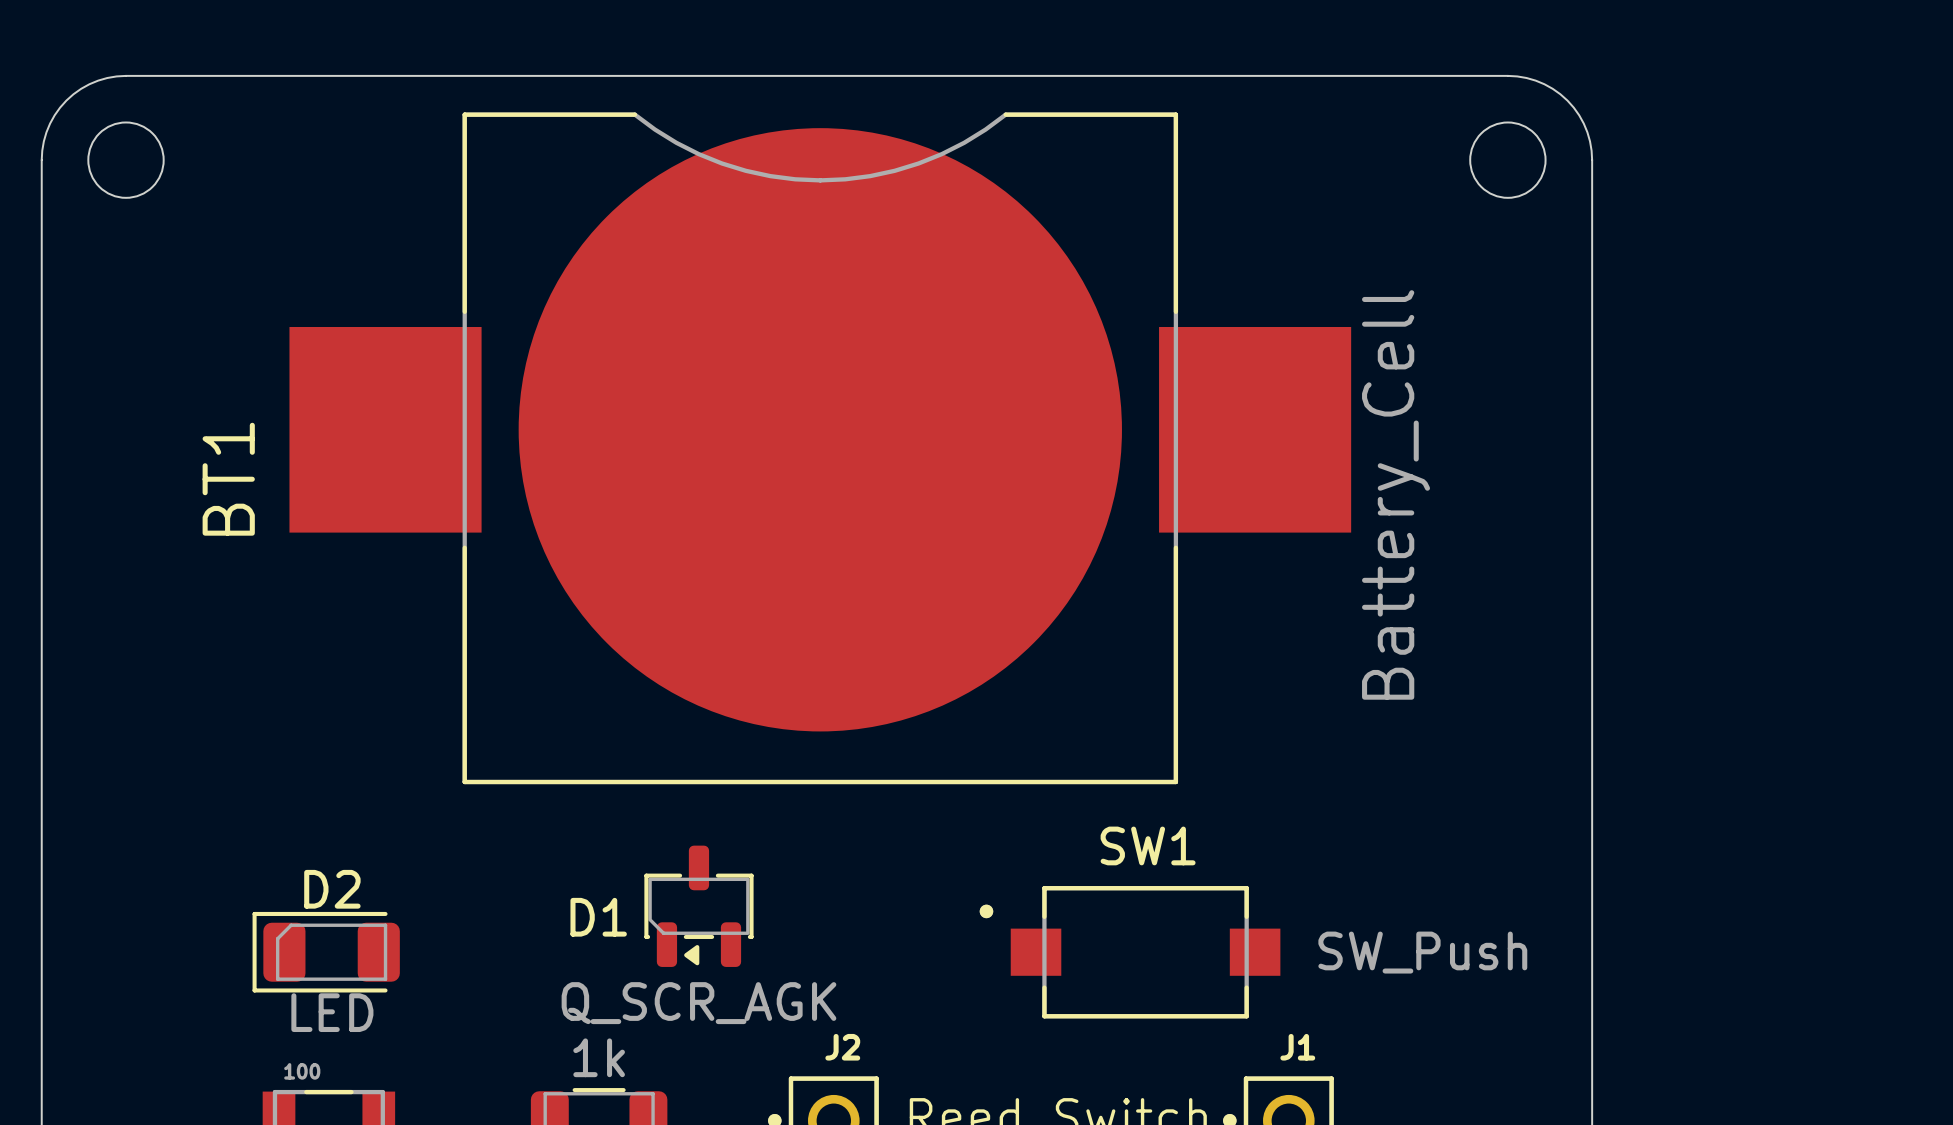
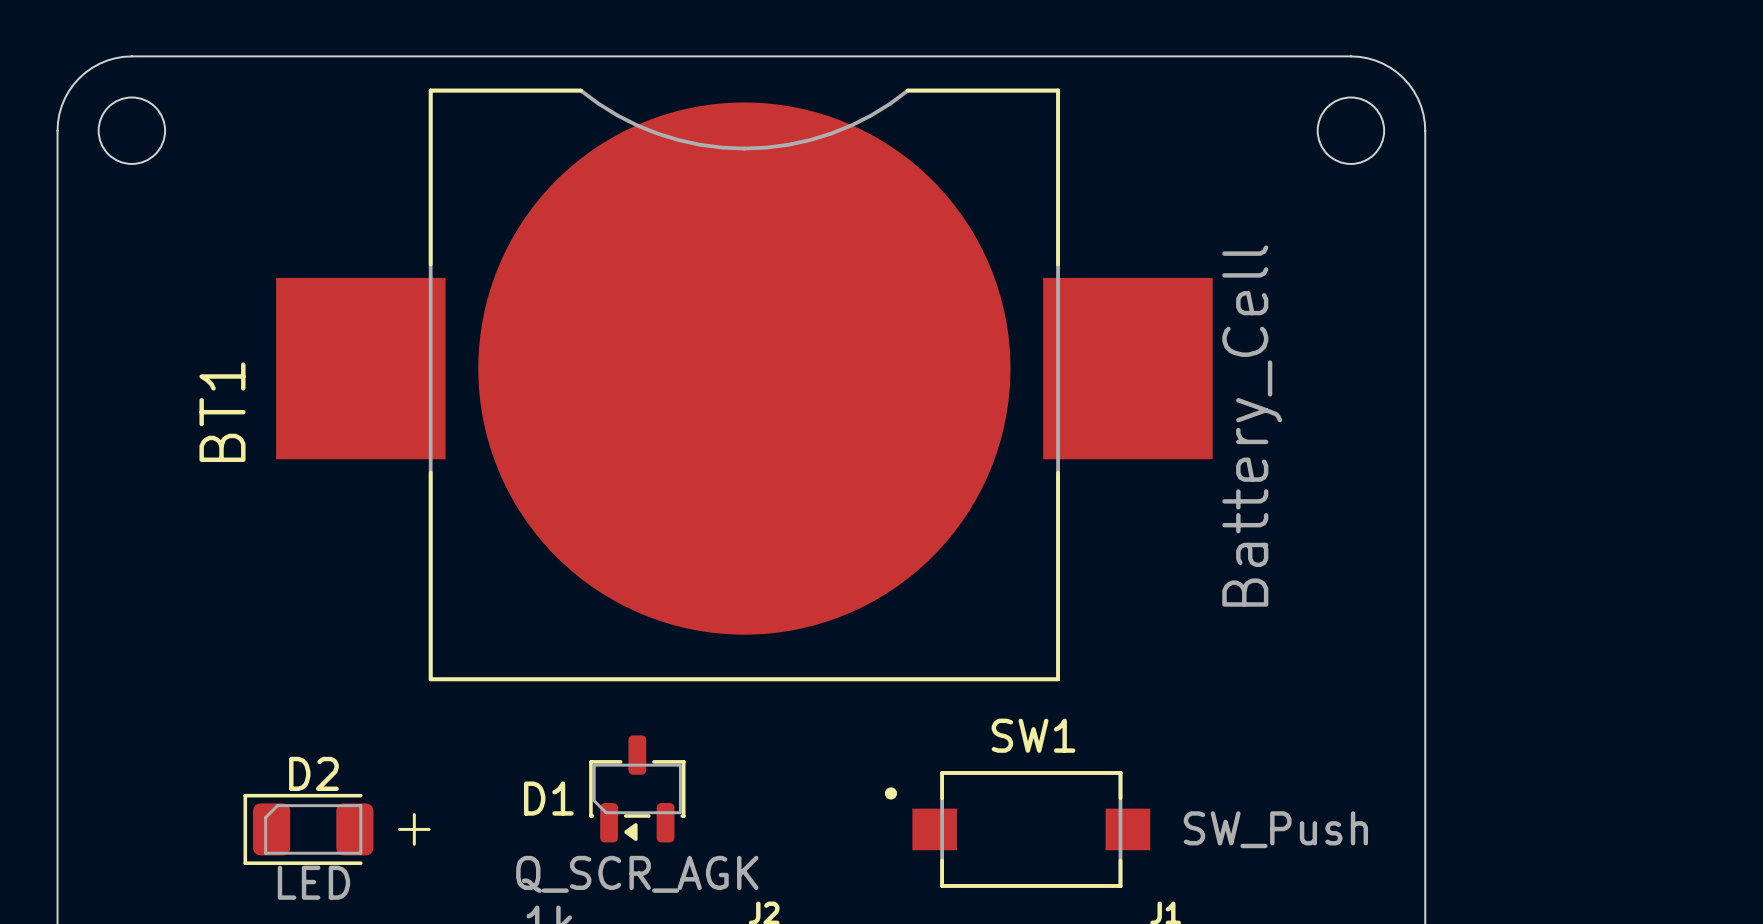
line: none -> (414, 814) (414, 844)
line: none -> (399, 829) (429, 829)

